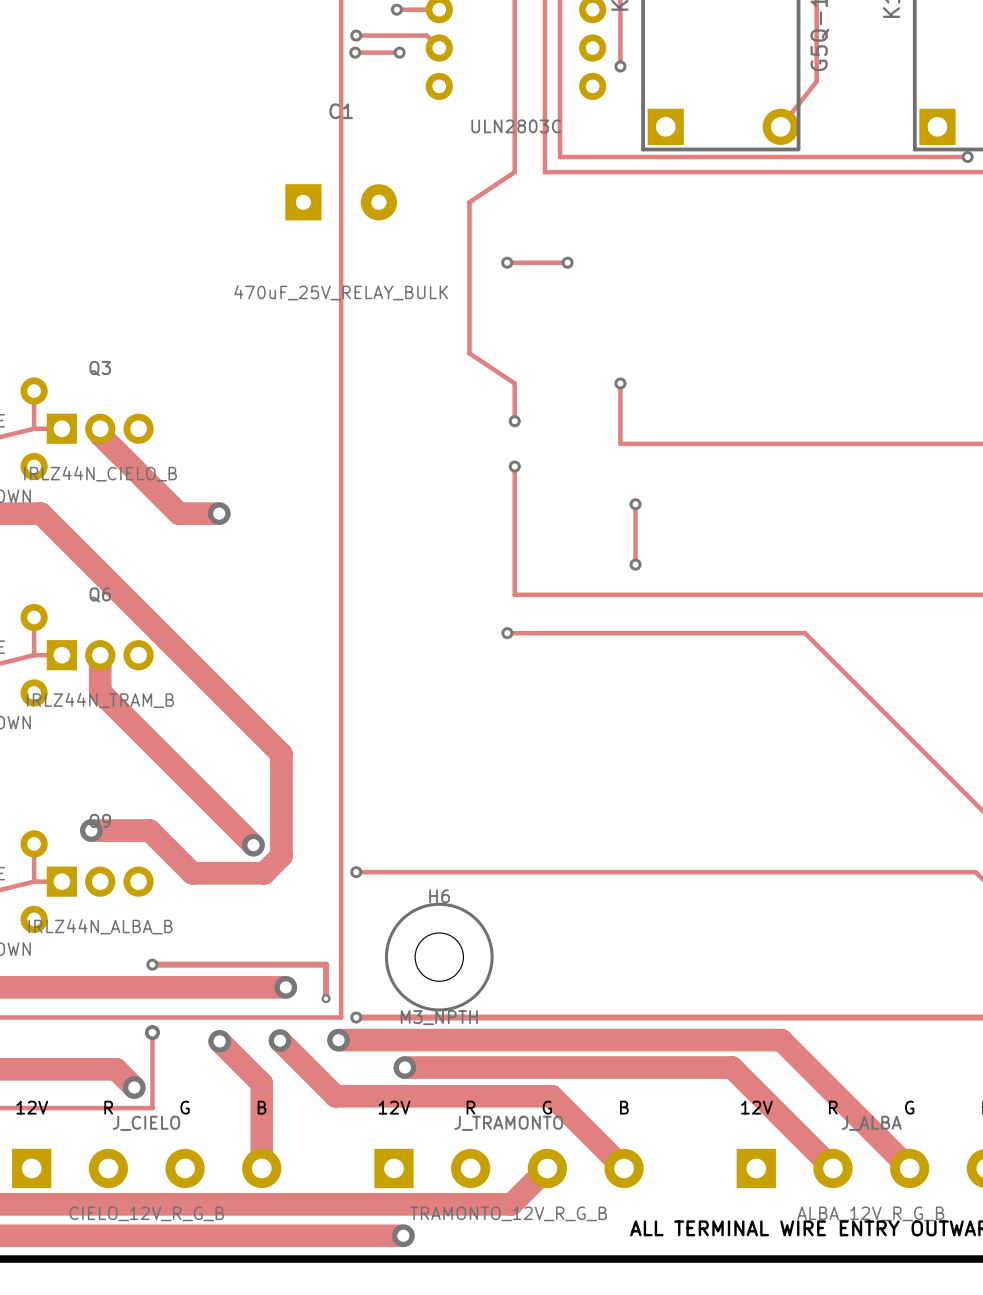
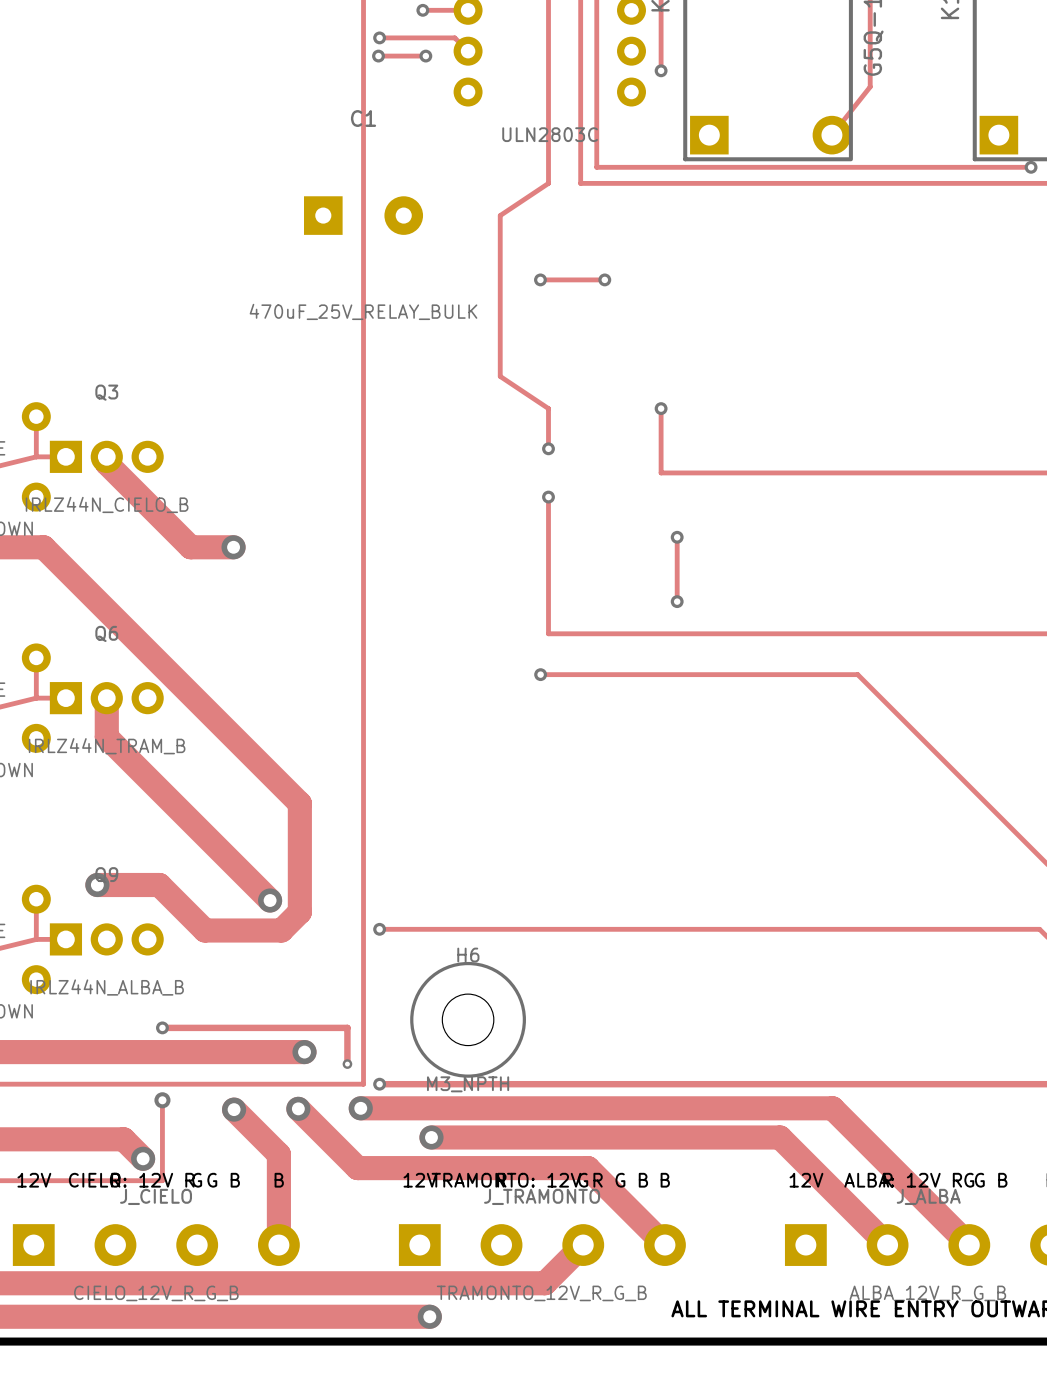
text: none -> CIELO: 12V R G B (154, 1180)
text: none -> TRAMONTO: 12V R G B (539, 1180)
text: none -> ALBA: 12V R G B (925, 1180)

